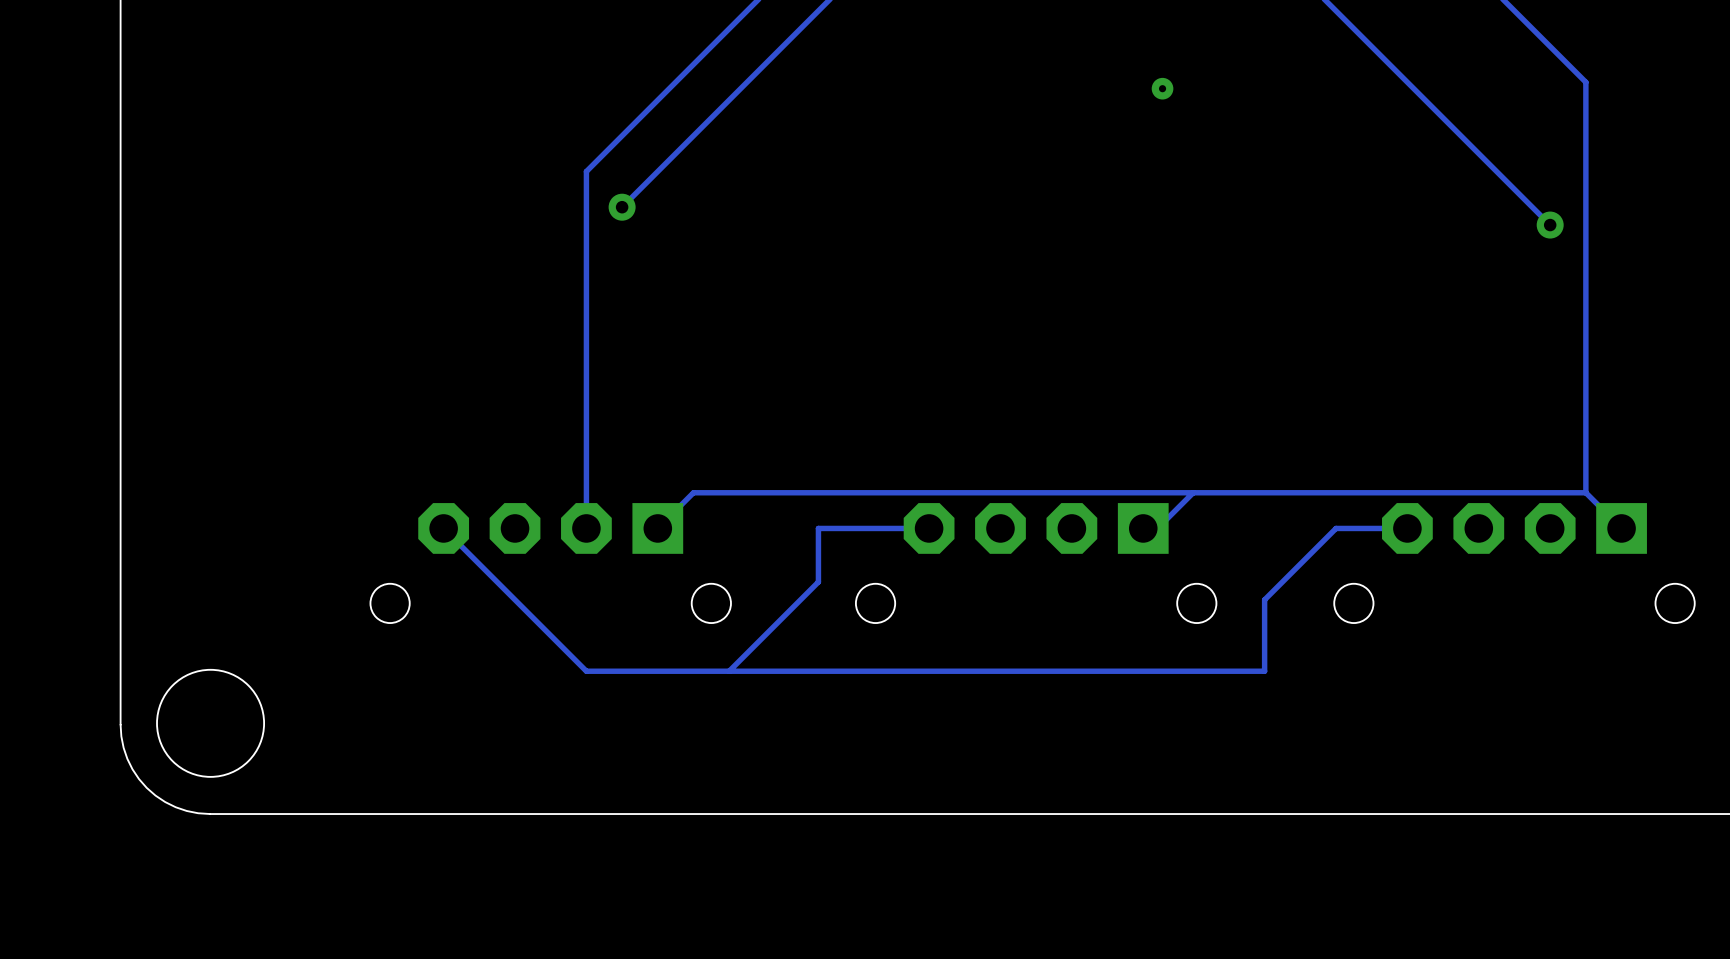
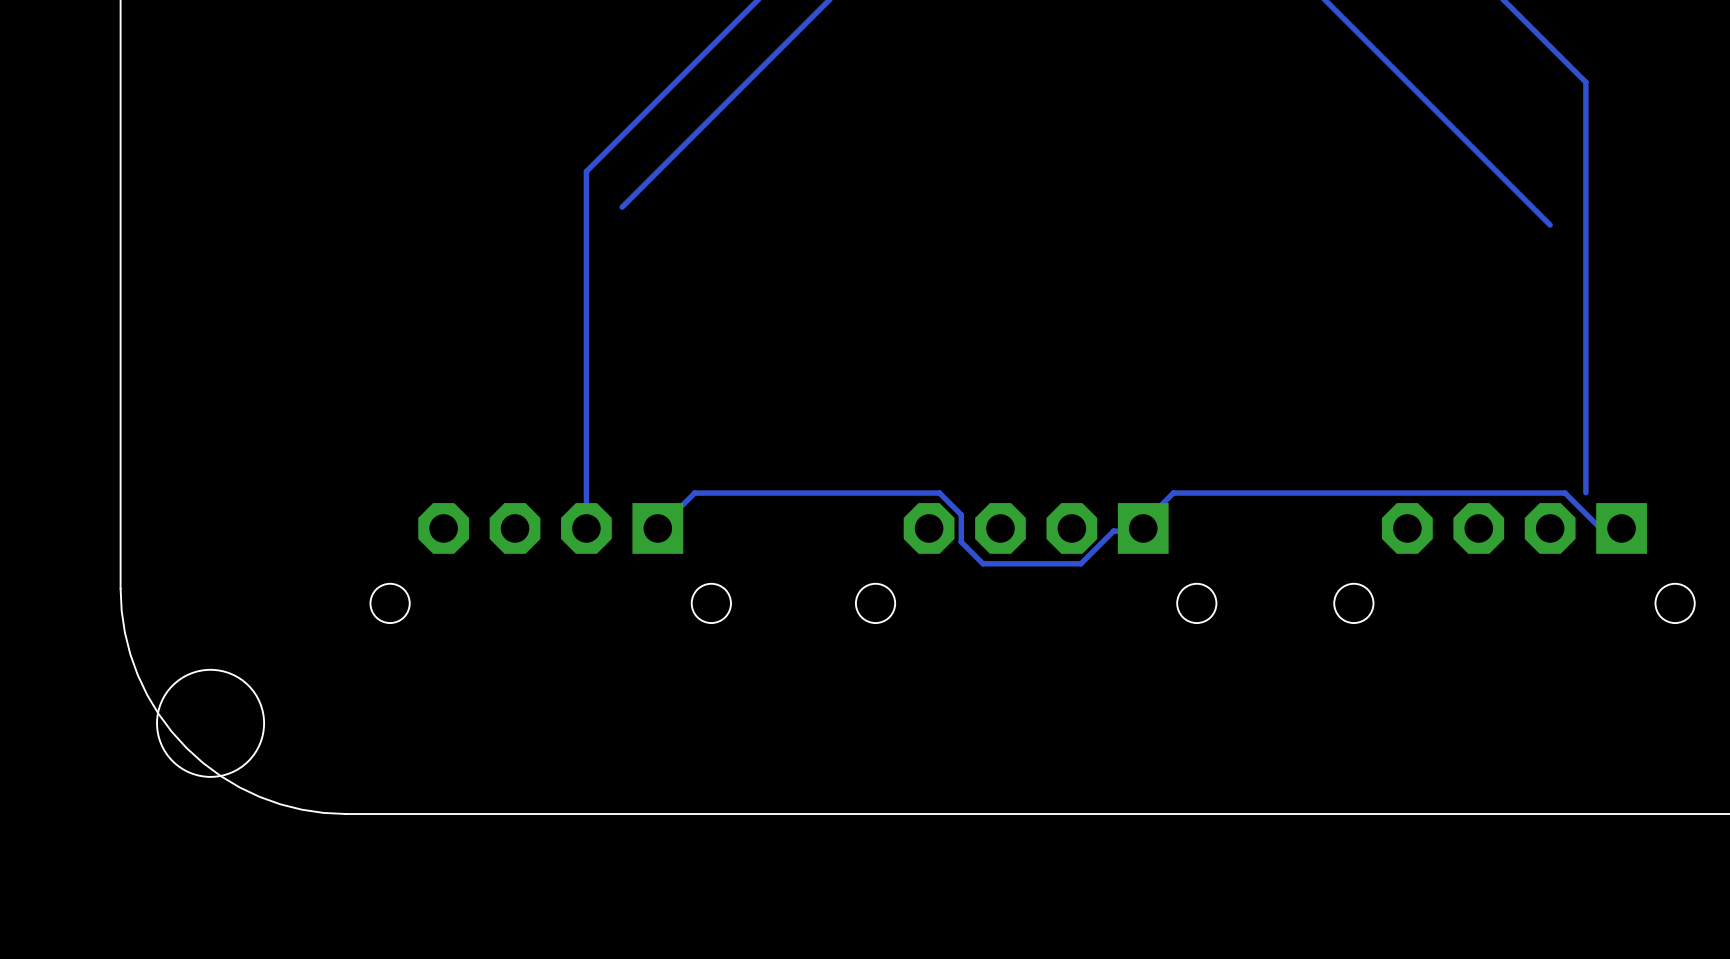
via: (1162, 88) -> none
via: (622, 207) -> none
via: (1550, 225) -> none
track: (1193, 492) (1157, 528) (1143, 528) -> none
track: (929, 528) (818, 528) (818, 582) (729, 671) -> none
track: (1407, 528) (1336, 528) (1264, 599) (1264, 671) (586, 671) (443, 528) -> none
track: (1621, 528) (1585, 492) (693, 492) (657, 528) -> (1621, 528) (1619, 525) (1597, 525) (1565, 493) (1173, 493) (1139, 528) (1135, 531) (1113, 531) (1080, 563) (983, 563) (961, 542) (961, 514) (939, 493) (694, 493) (657, 528)
board edge: (120, 588) (121, 736) (127, 758) (132, 769) (146, 787) (165, 802) (175, 807) (198, 813) (345, 814) -> (120, 588) (124, 632) (137, 674) (158, 713) (186, 748) (220, 776) (259, 796) (301, 809) (345, 814)

